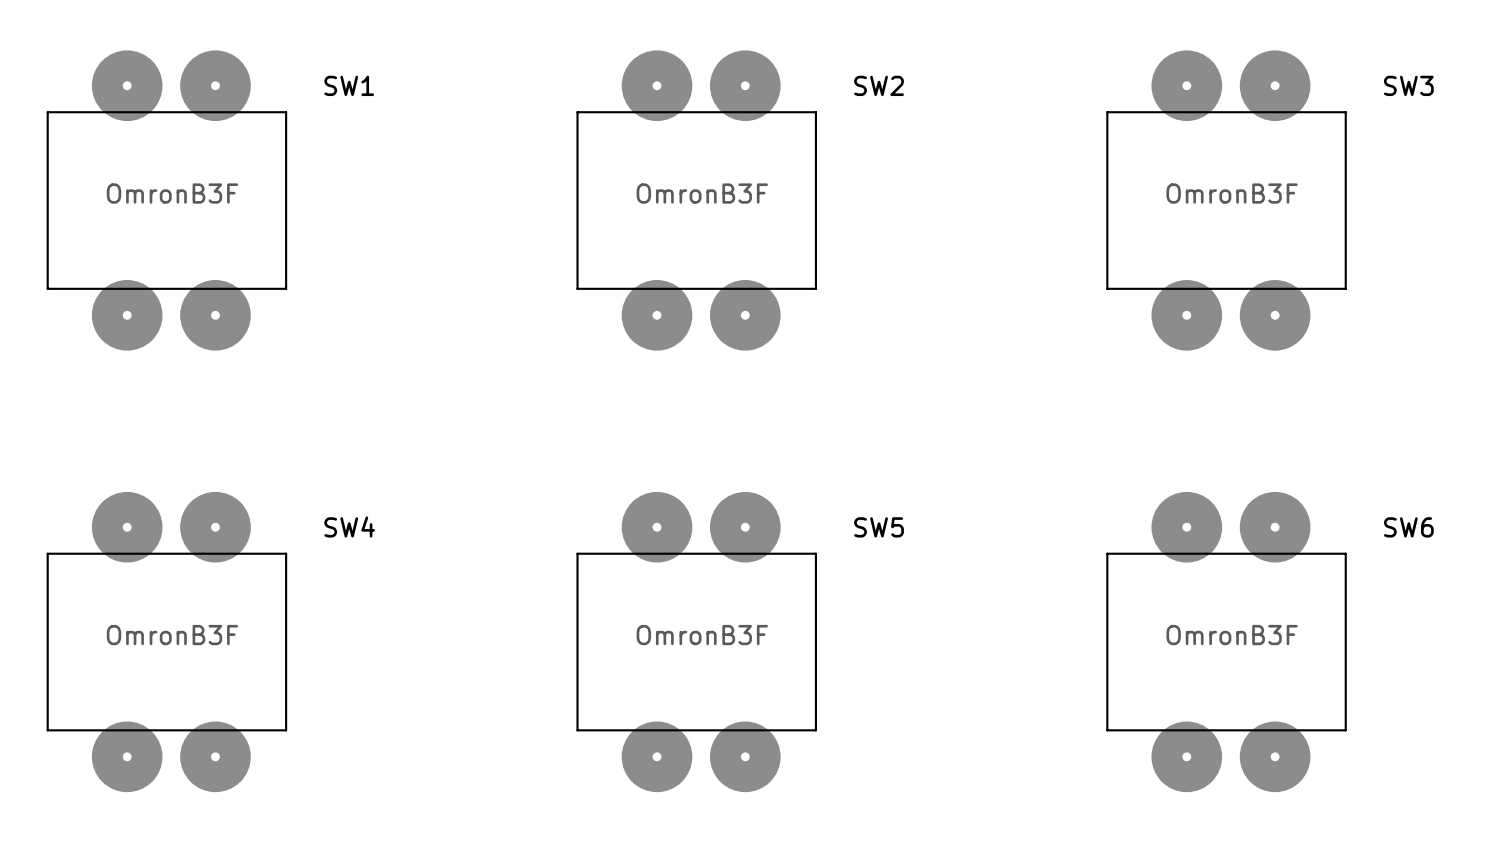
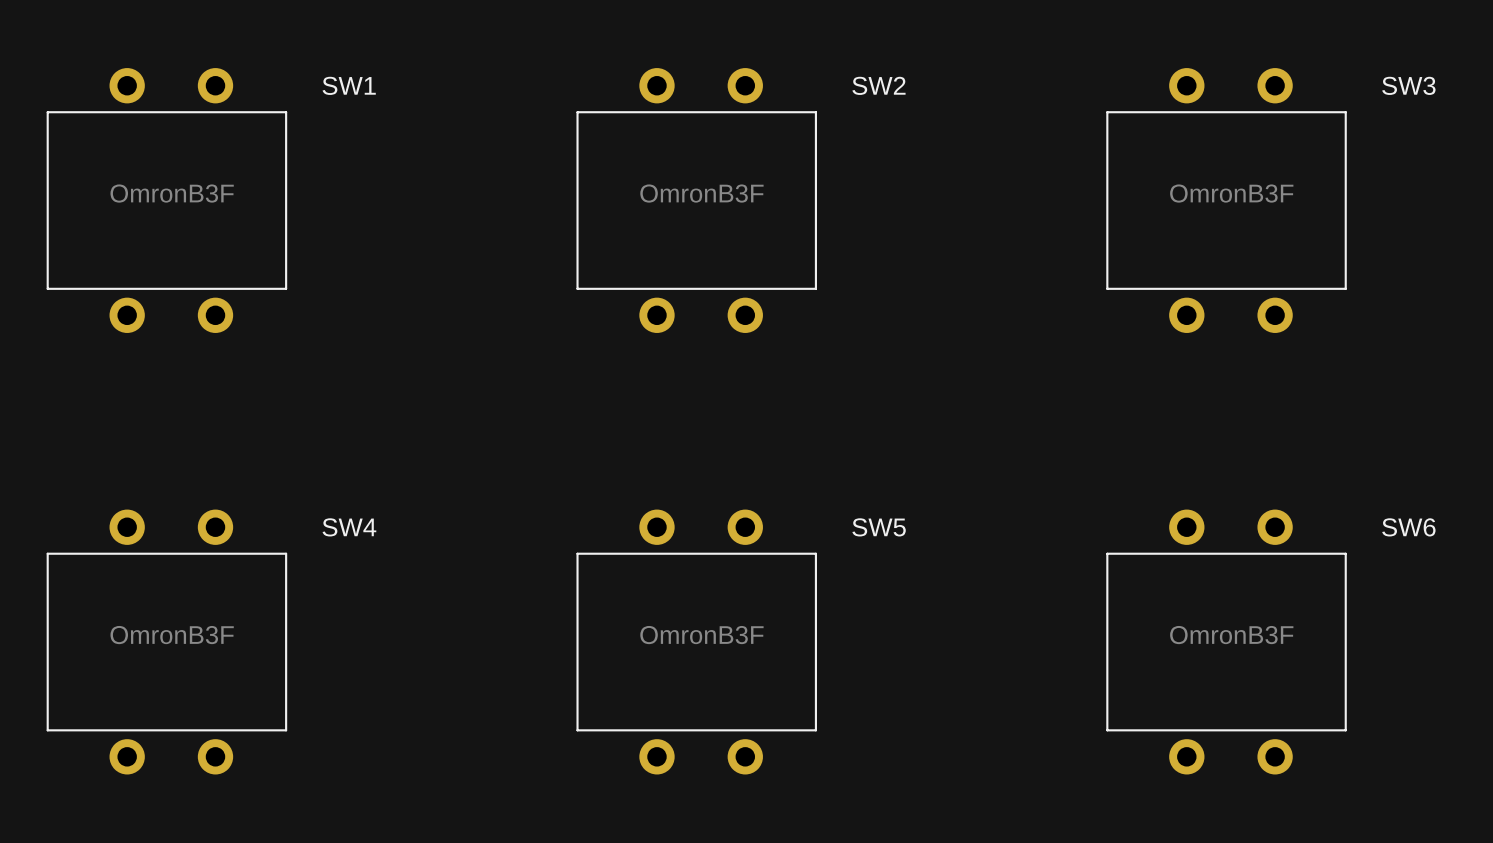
SW1 footprint: [46, 50, 288, 351] -> [46, 68, 288, 333]
SW2 footprint: [576, 50, 817, 351] -> [576, 68, 817, 333]
SW3 footprint: [1106, 50, 1347, 351] -> [1106, 68, 1347, 333]
SW4 footprint: [46, 491, 288, 793] -> [46, 509, 288, 775]
SW5 footprint: [576, 491, 817, 793] -> [576, 509, 817, 775]
SW6 footprint: [1106, 491, 1347, 793] -> [1106, 509, 1347, 775]

